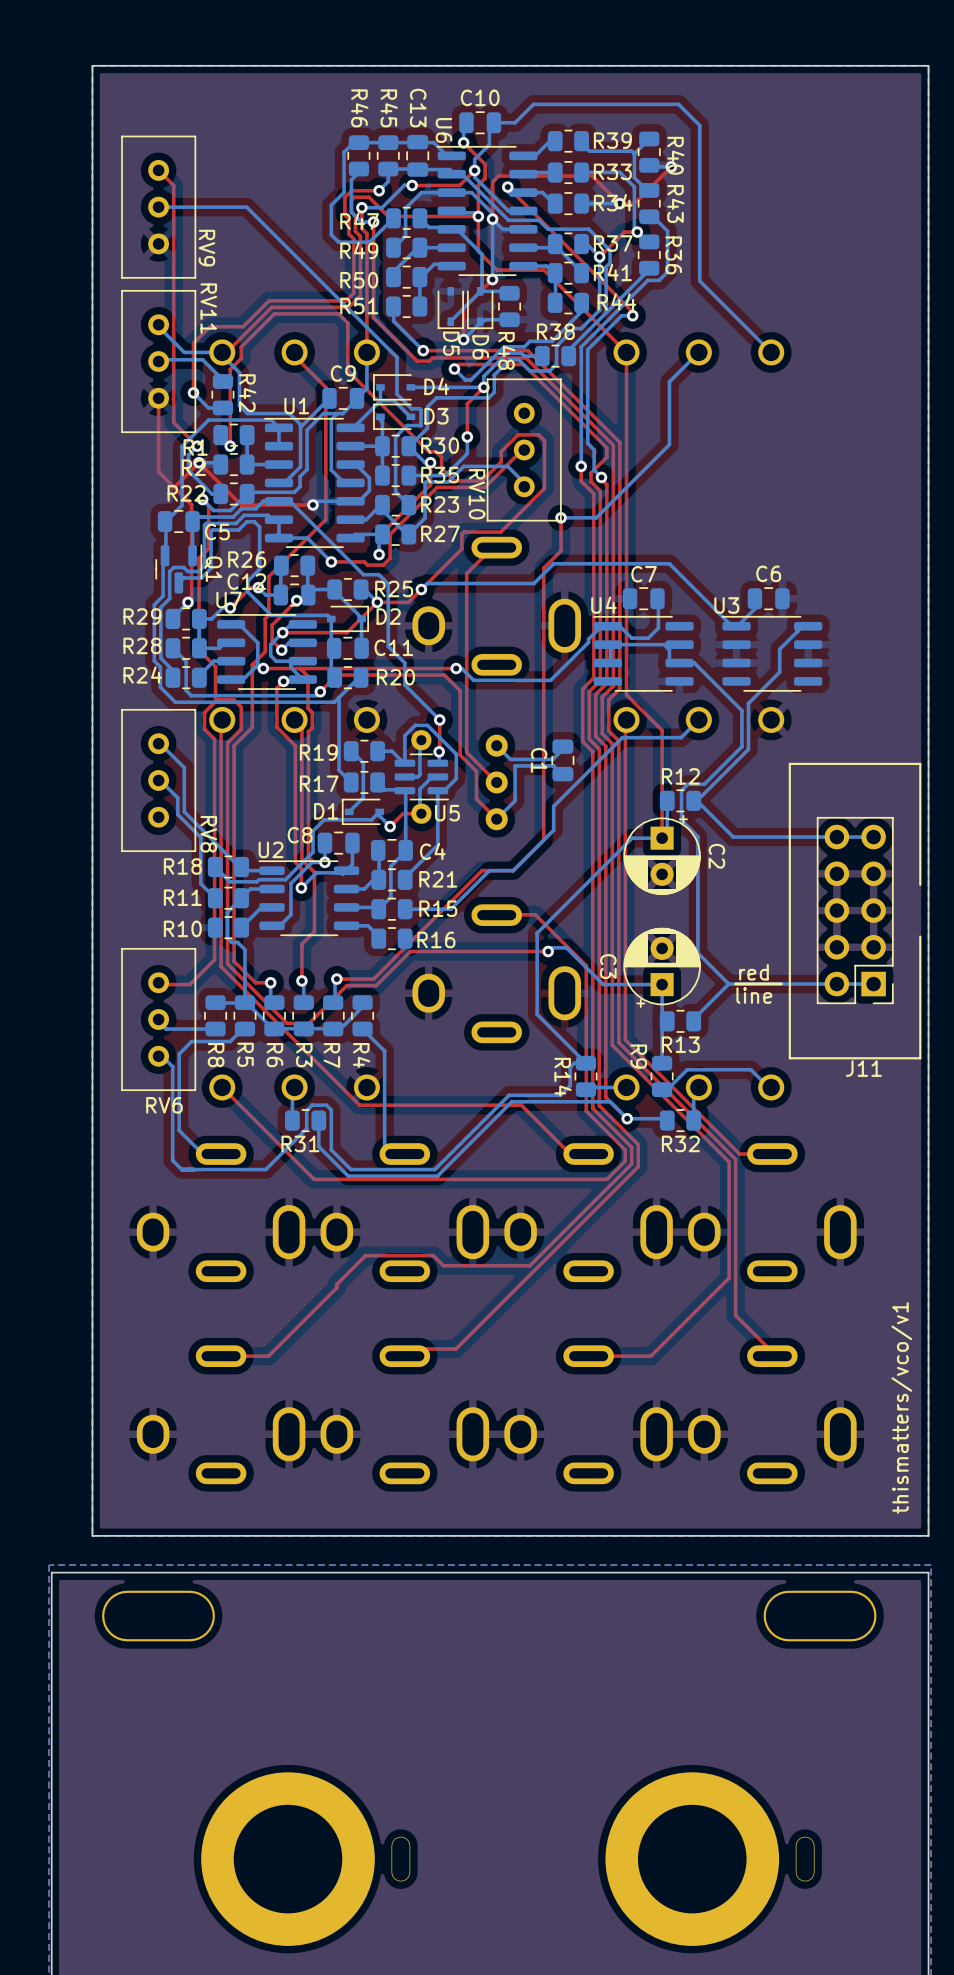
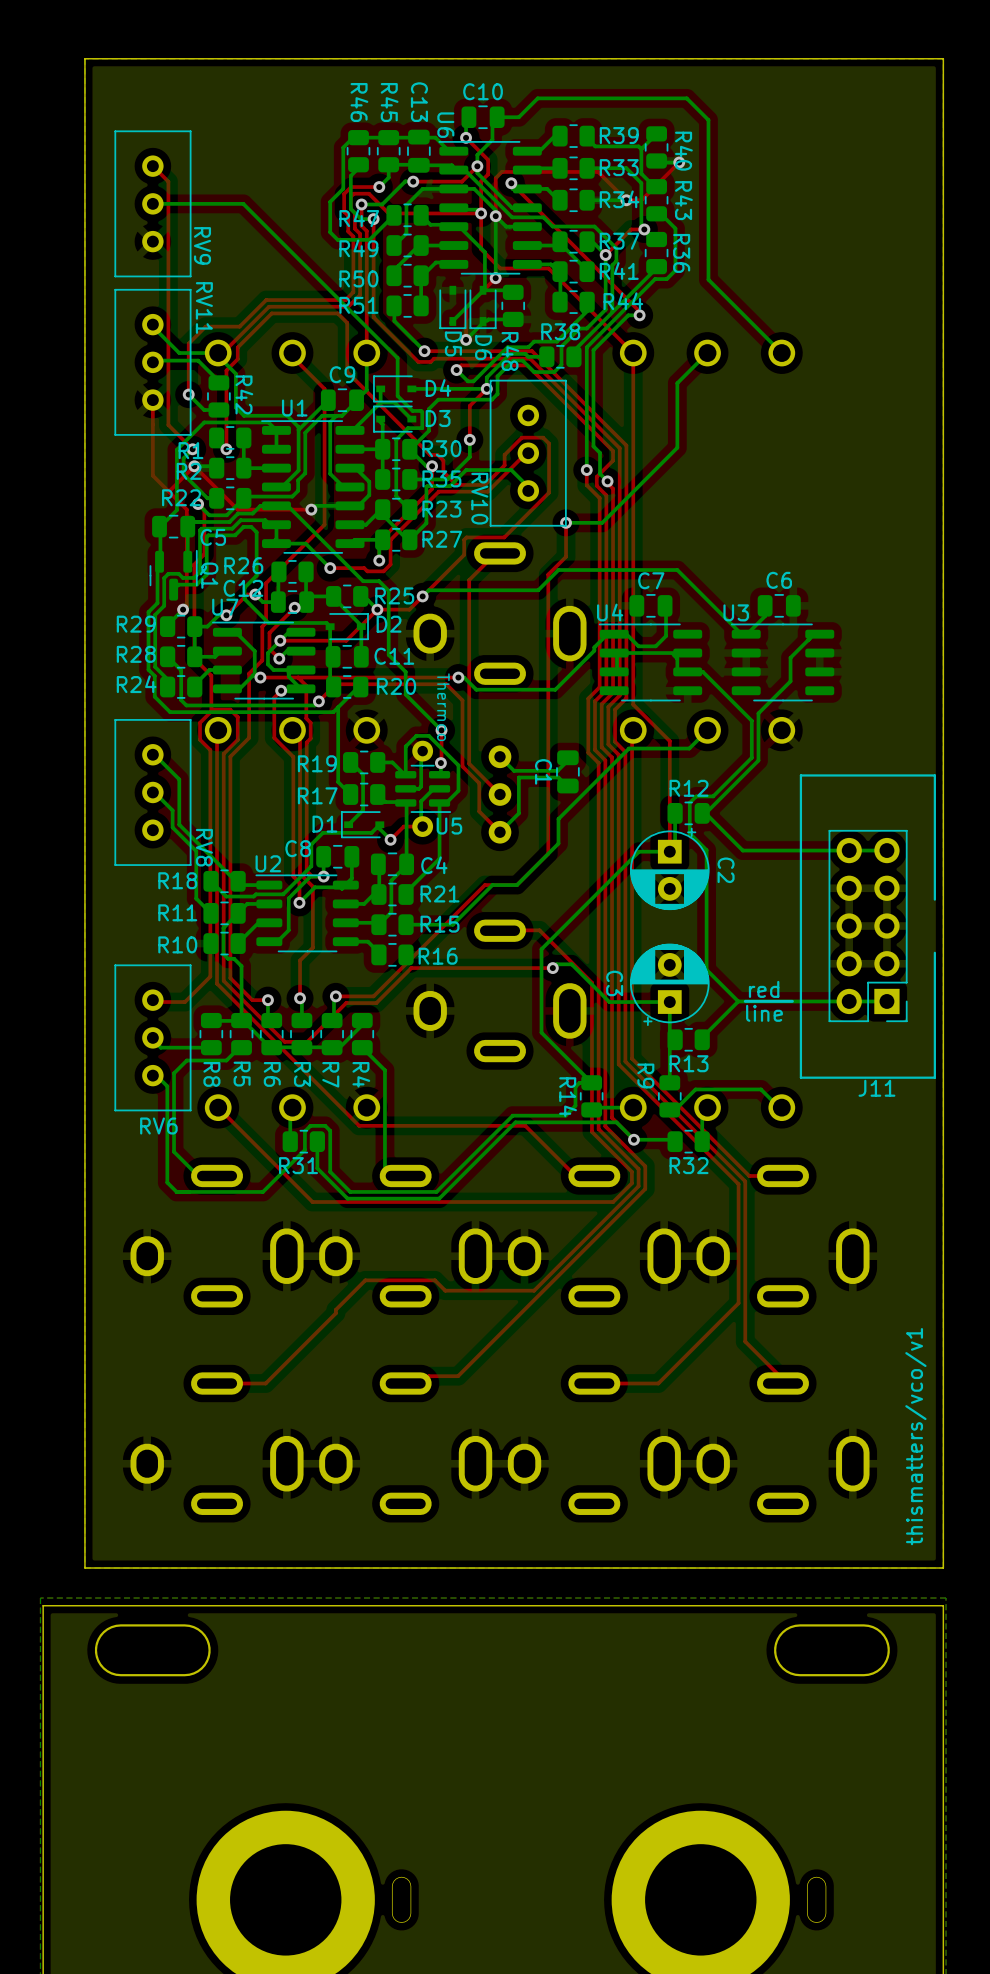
text: none -> Thermco (443, 707)

